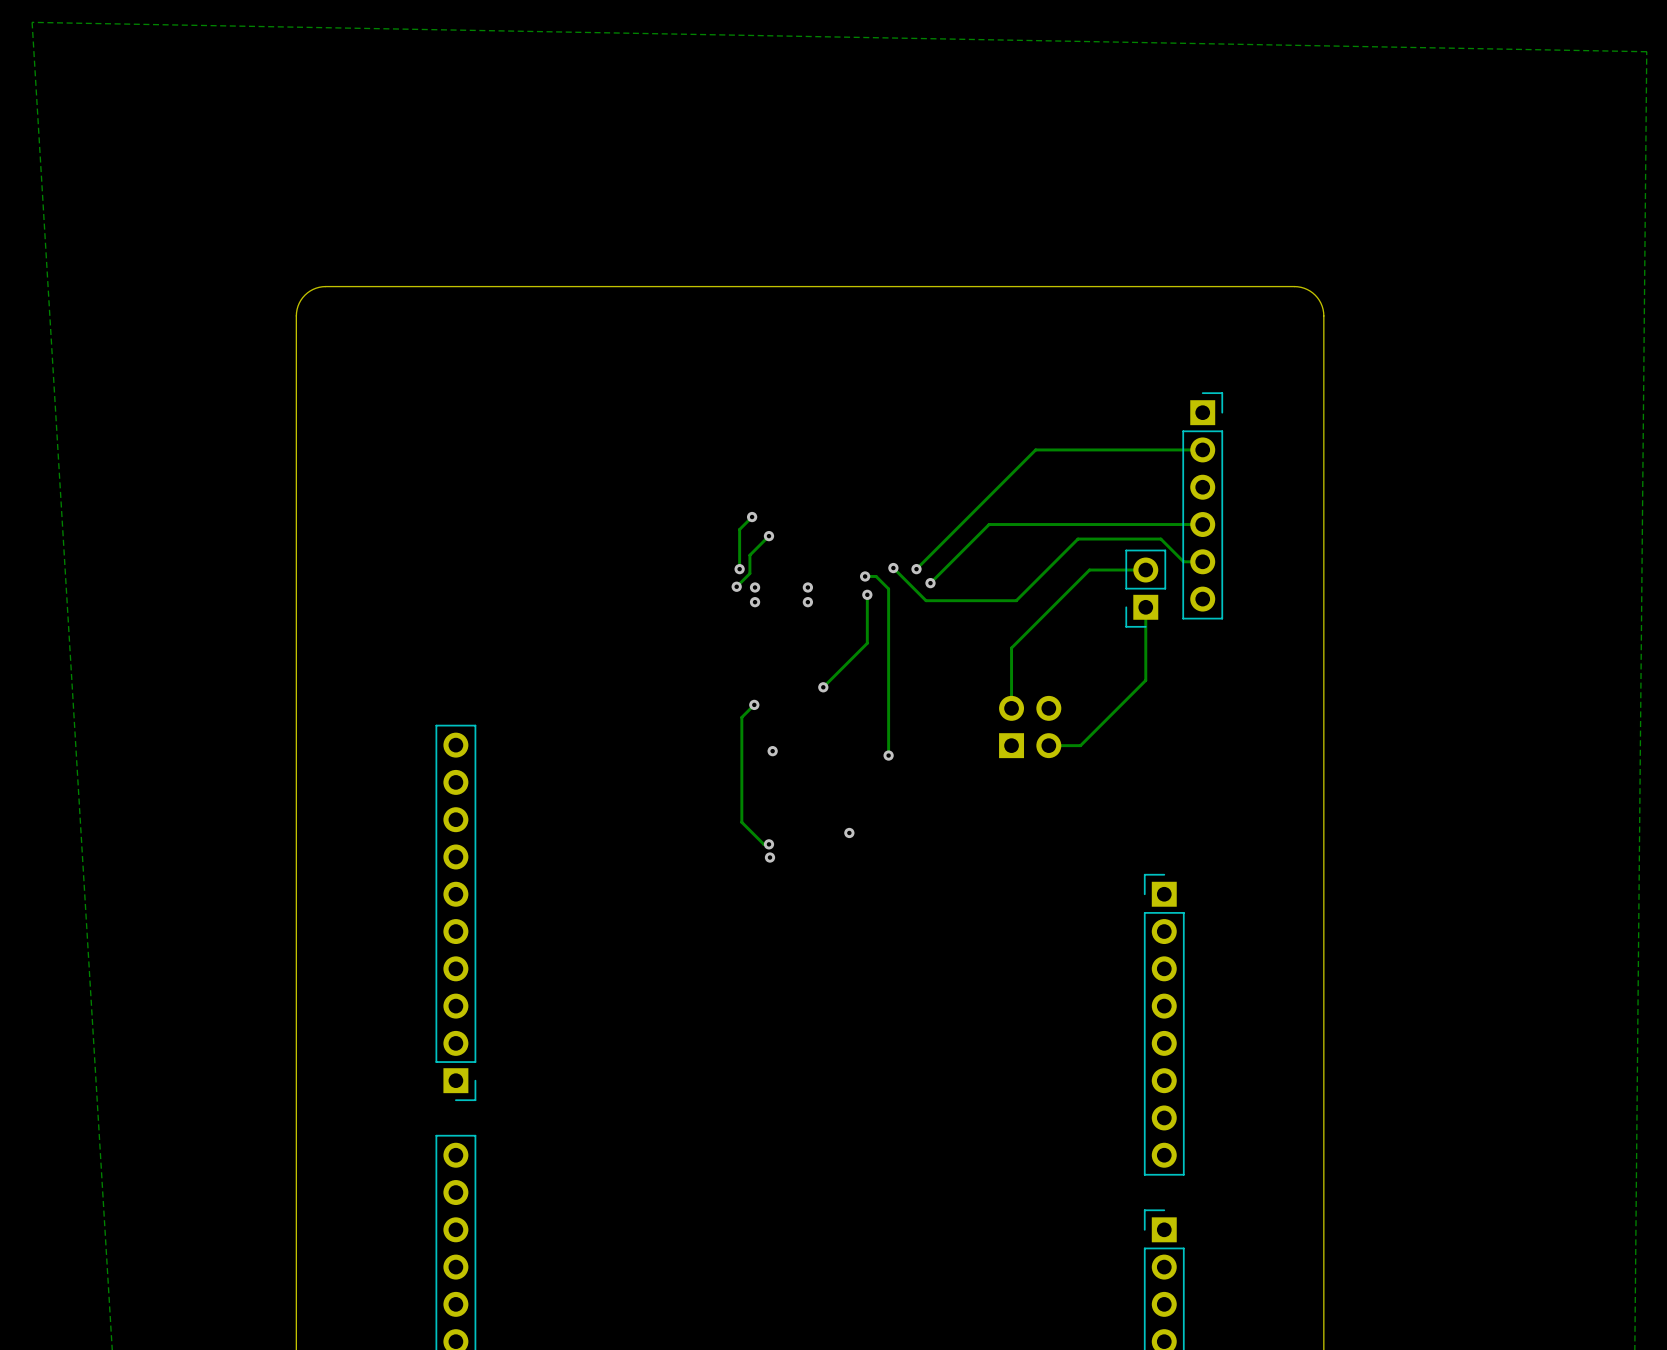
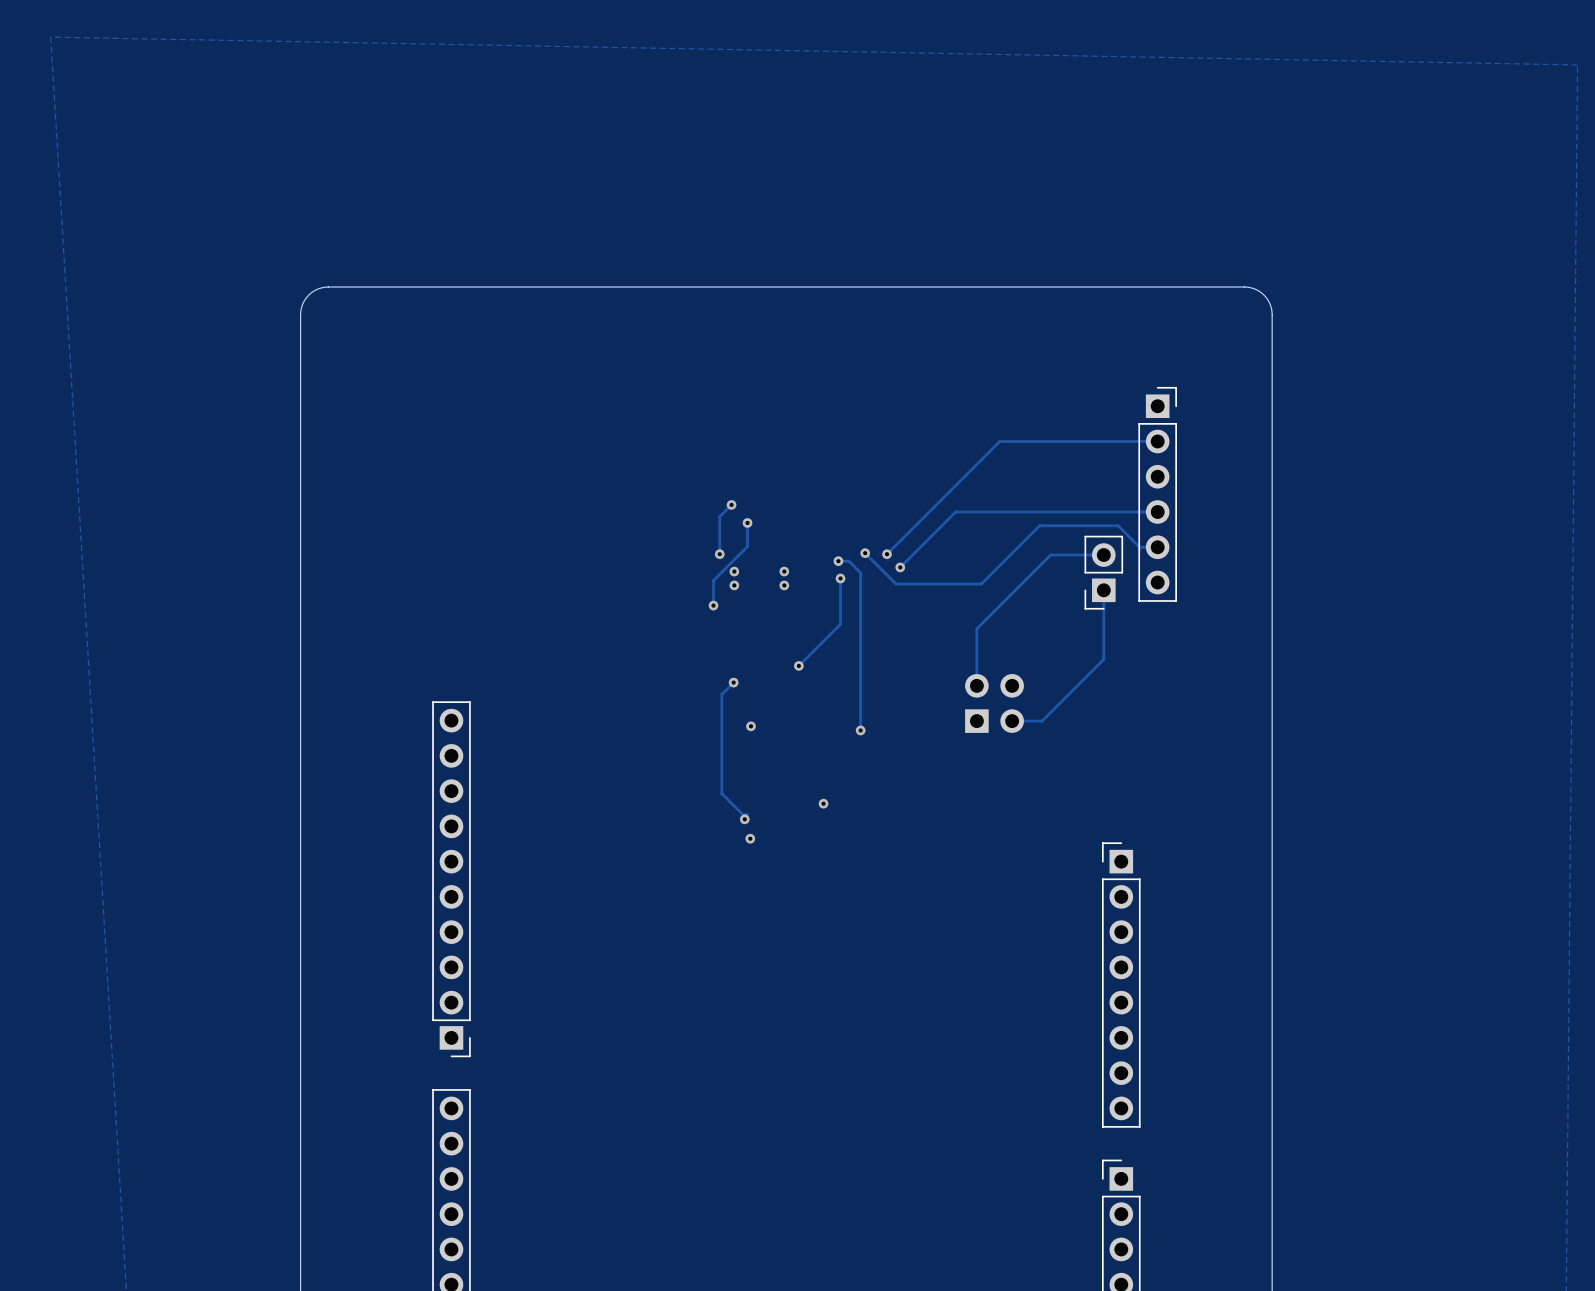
track: (768, 536) (749, 555) (749, 573) (736, 586) -> (747, 522) (747, 546) (713, 580) (713, 605)
via position: (736, 586) -> (713, 605)
via: (768, 844) -> none
via: none -> (744, 819)
via: (770, 857) -> none
via: none -> (750, 838)

